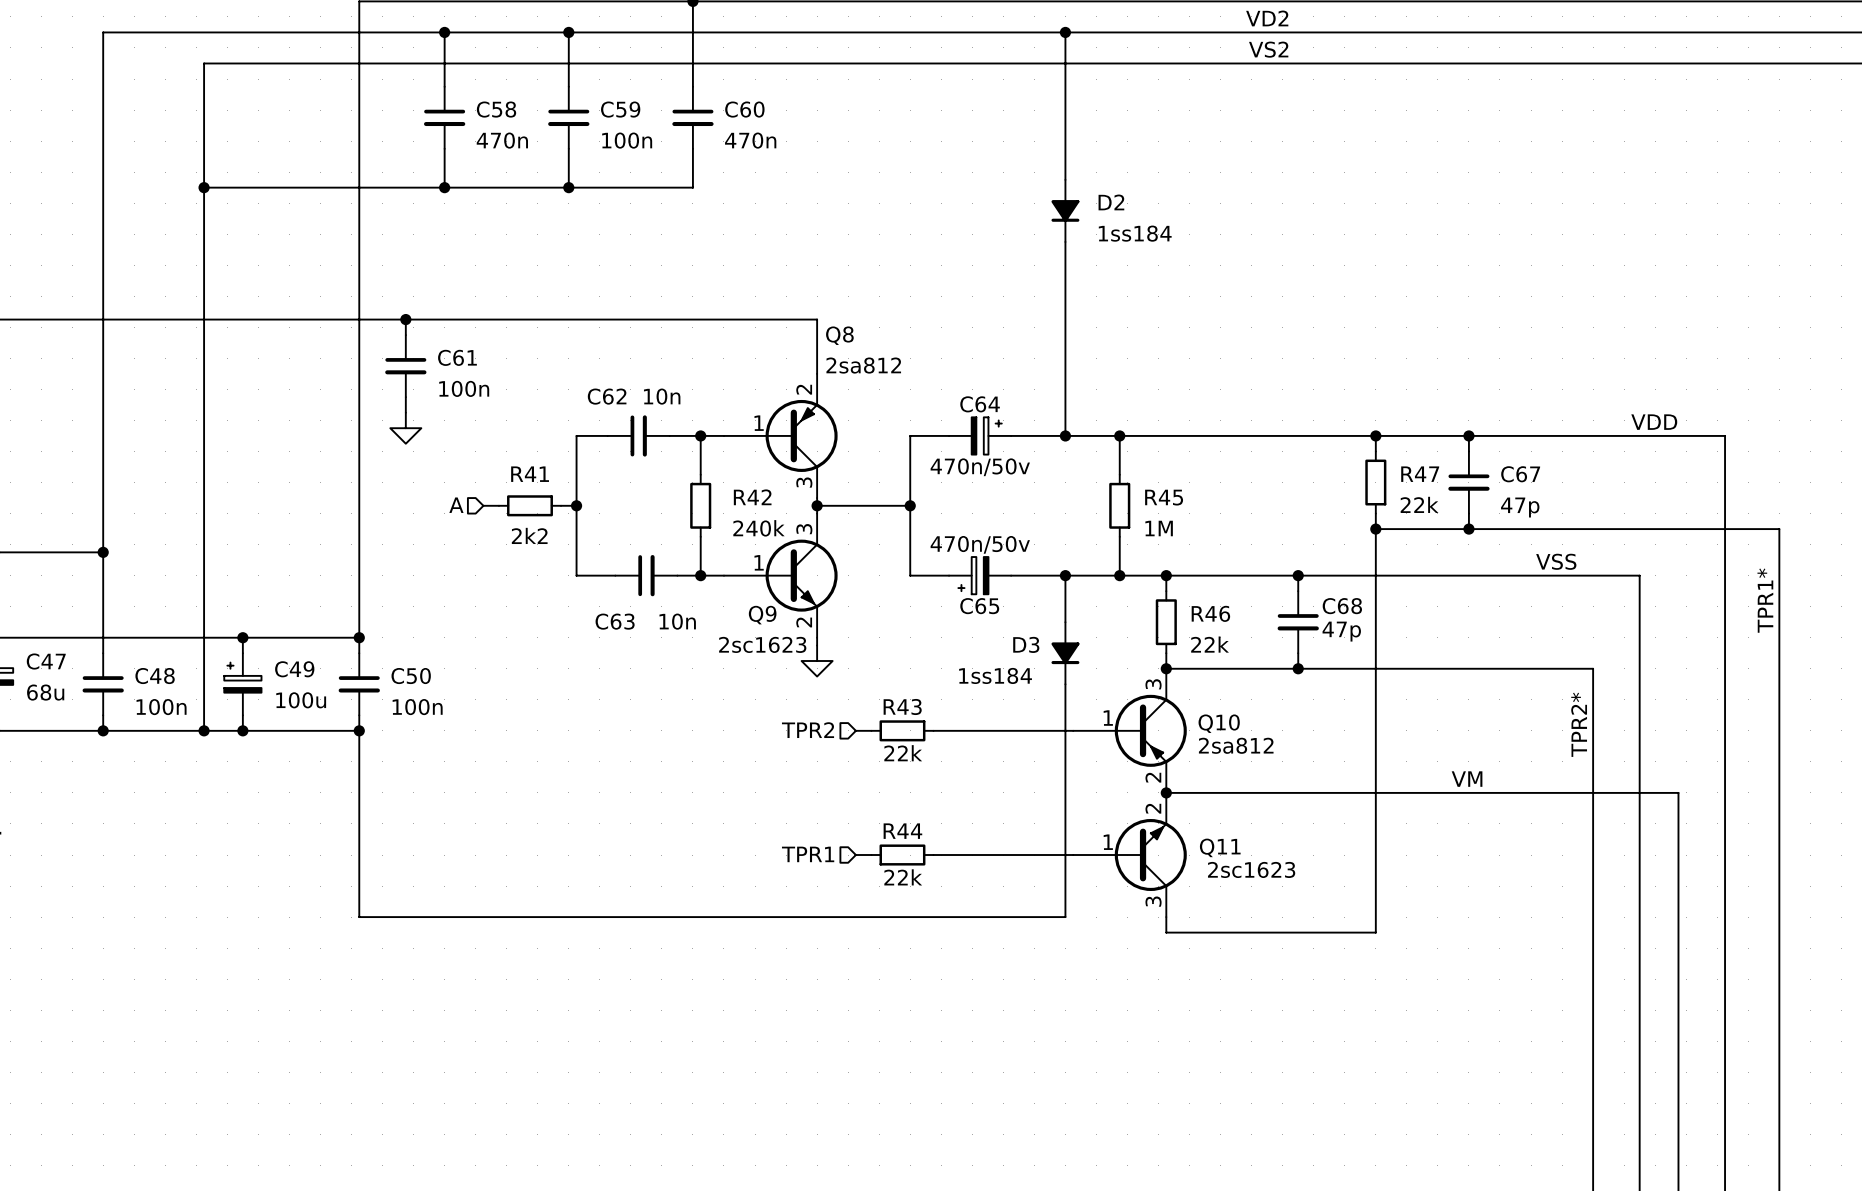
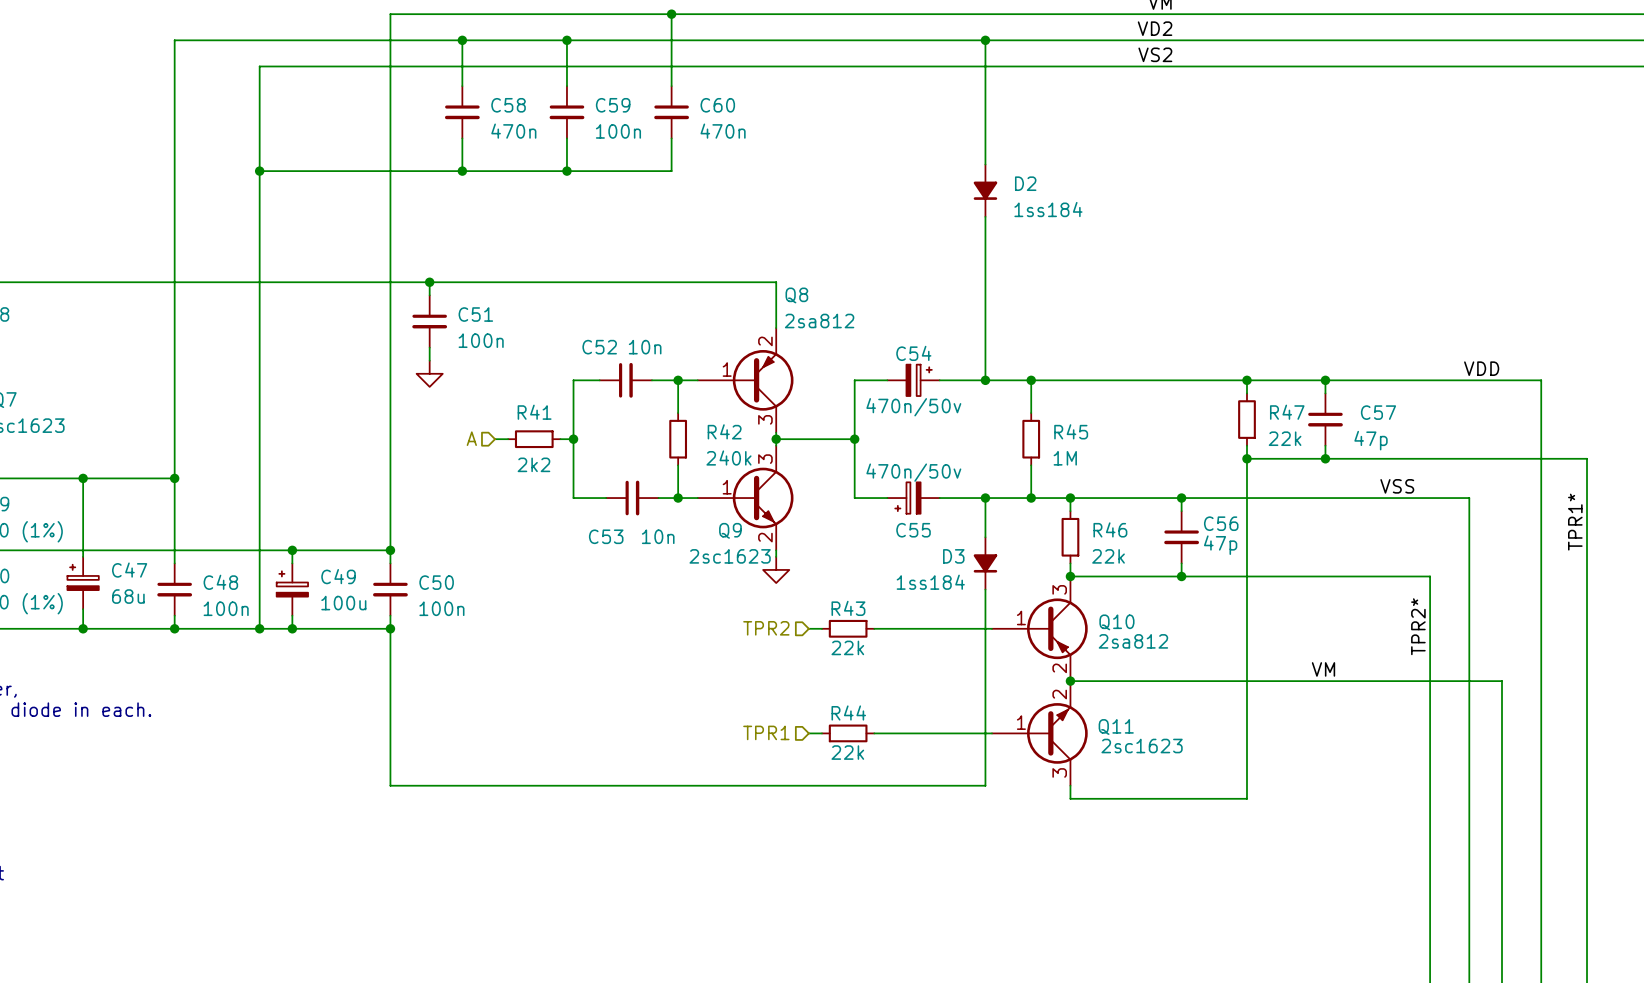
C61 name: C61 (457, 357) -> C51 (475, 314)
C62 name: C62 (607, 396) -> C52 (599, 347)
C64 name: C64 (980, 404) -> C54 (913, 353)
C67 name: C67 (1520, 474) -> C57 (1378, 412)
C65 name: C65 (979, 606) -> C55 (913, 530)
C68 name: C68 (1342, 606) -> C56 (1221, 523)
C63 name: C63 (615, 621) -> C53 (606, 536)

